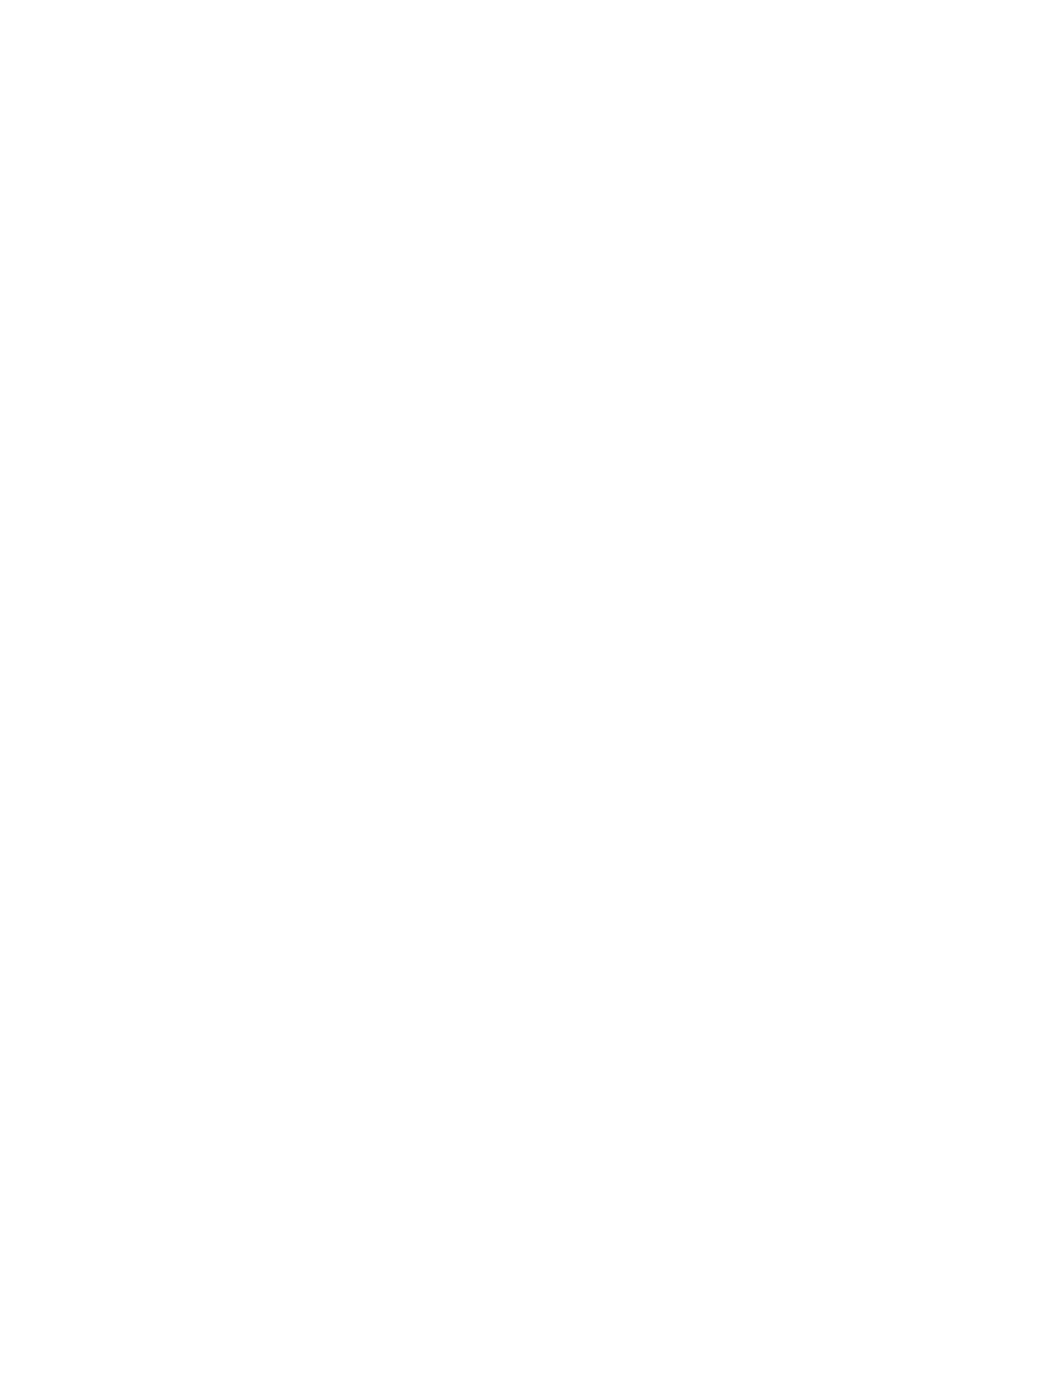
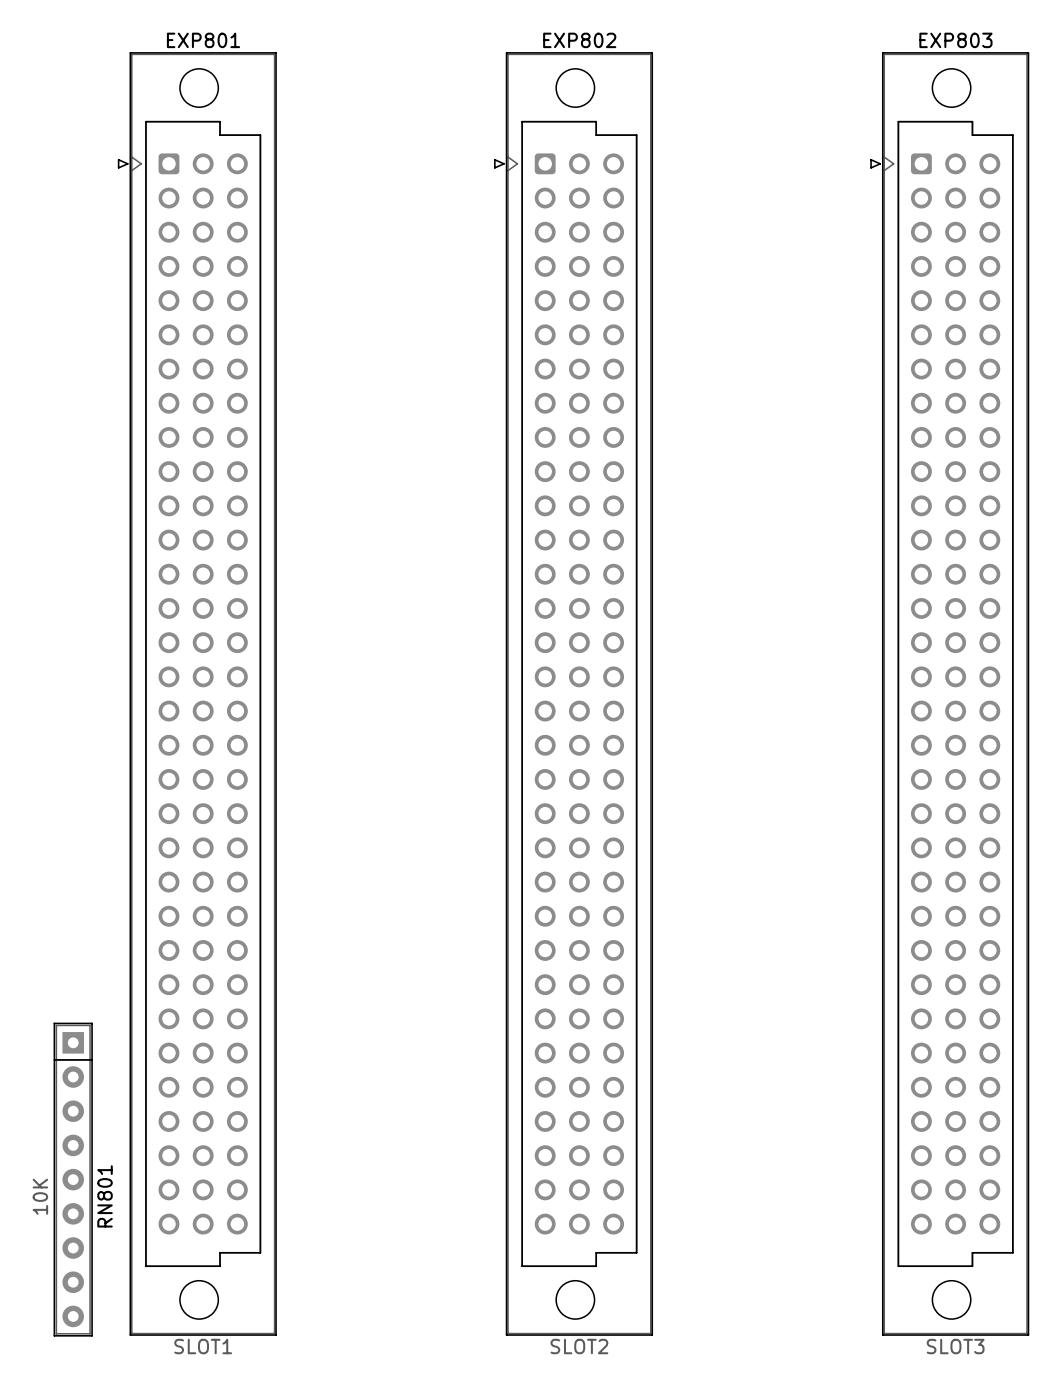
EXP801: none -> SLOT1 (197, 693)
EXP802: none -> SLOT2 (573, 693)
EXP803: none -> SLOT3 (949, 693)
RN801: none -> 10K (73, 1179)

